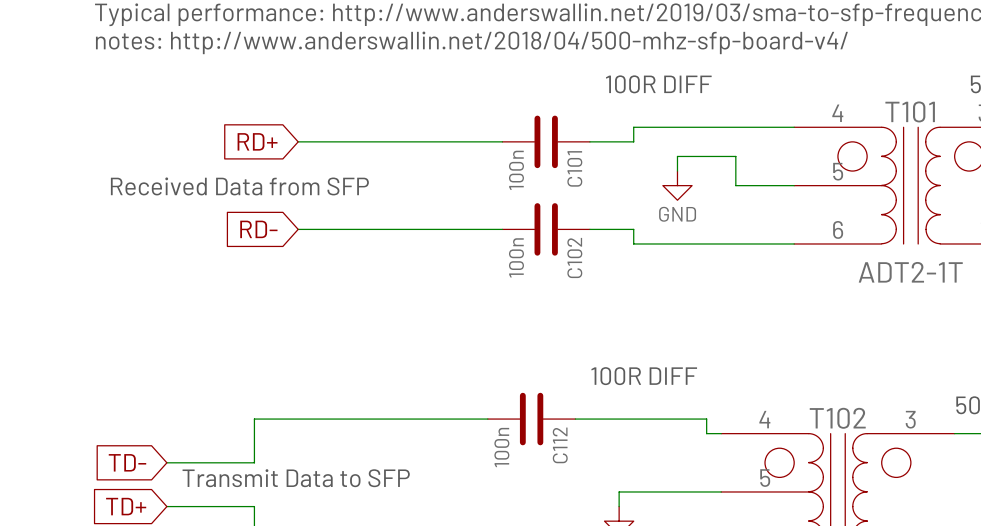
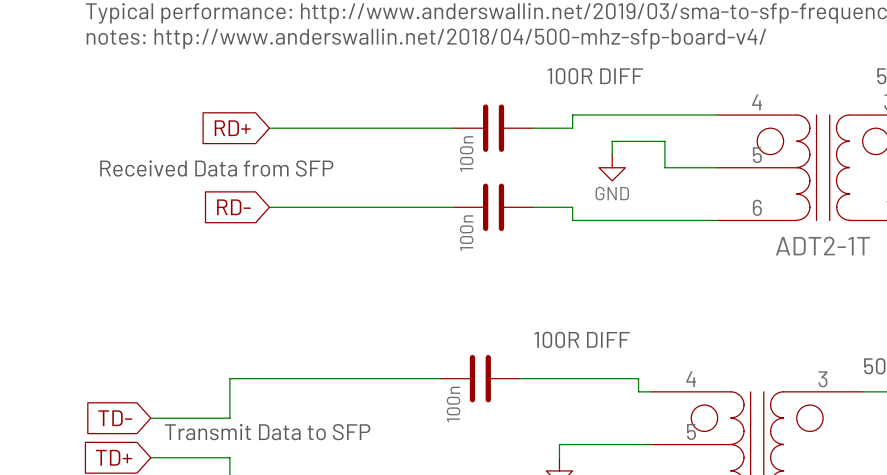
T101 name: T101 (910, 111) -> none
C101 name: C101 (574, 168) -> none
C102 name: C102 (574, 257) -> none
T102 name: T102 (837, 418) -> none
C112 name: C112 (560, 445) -> none

